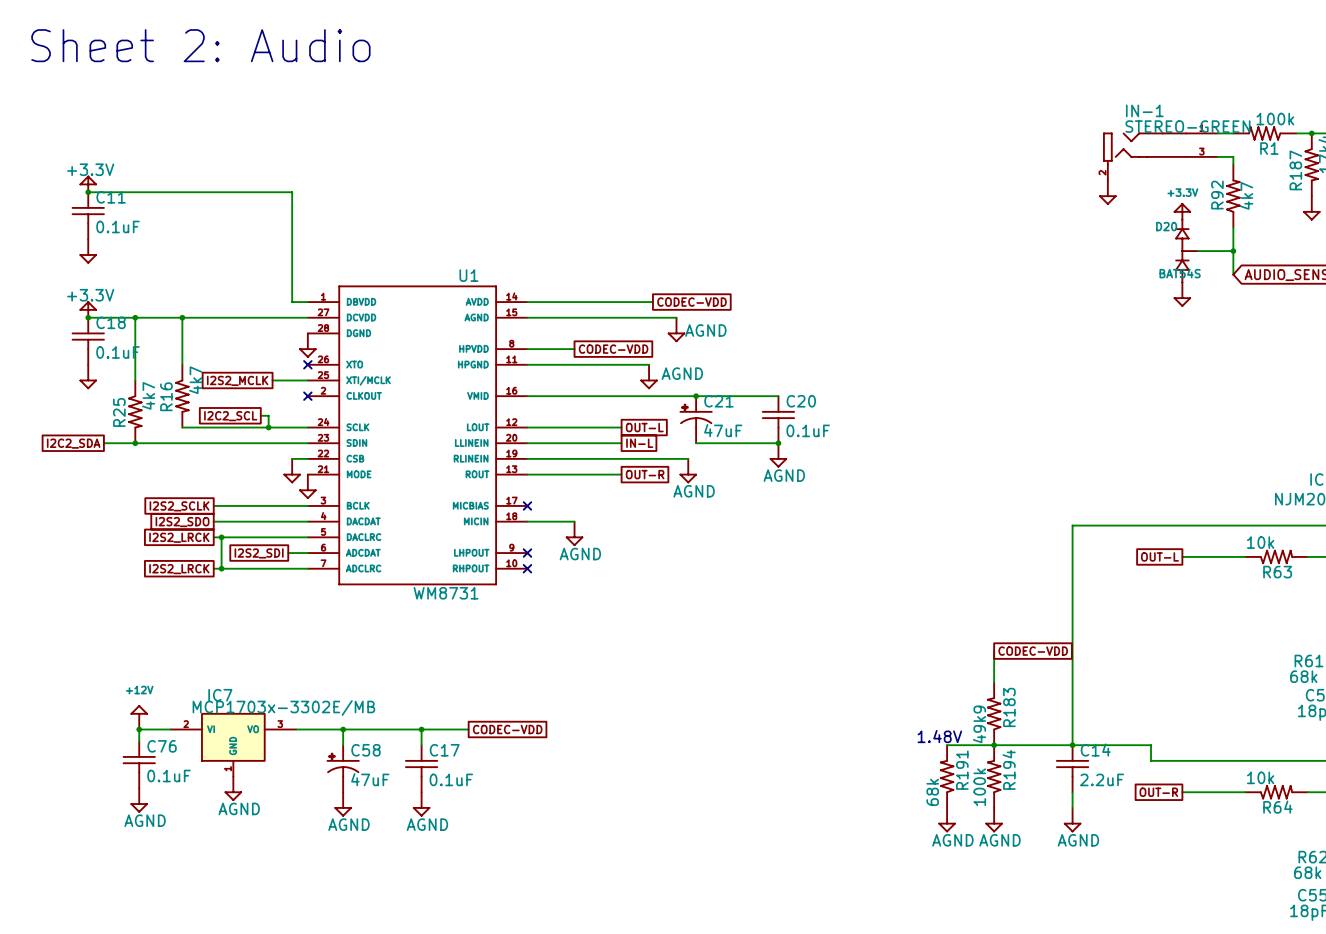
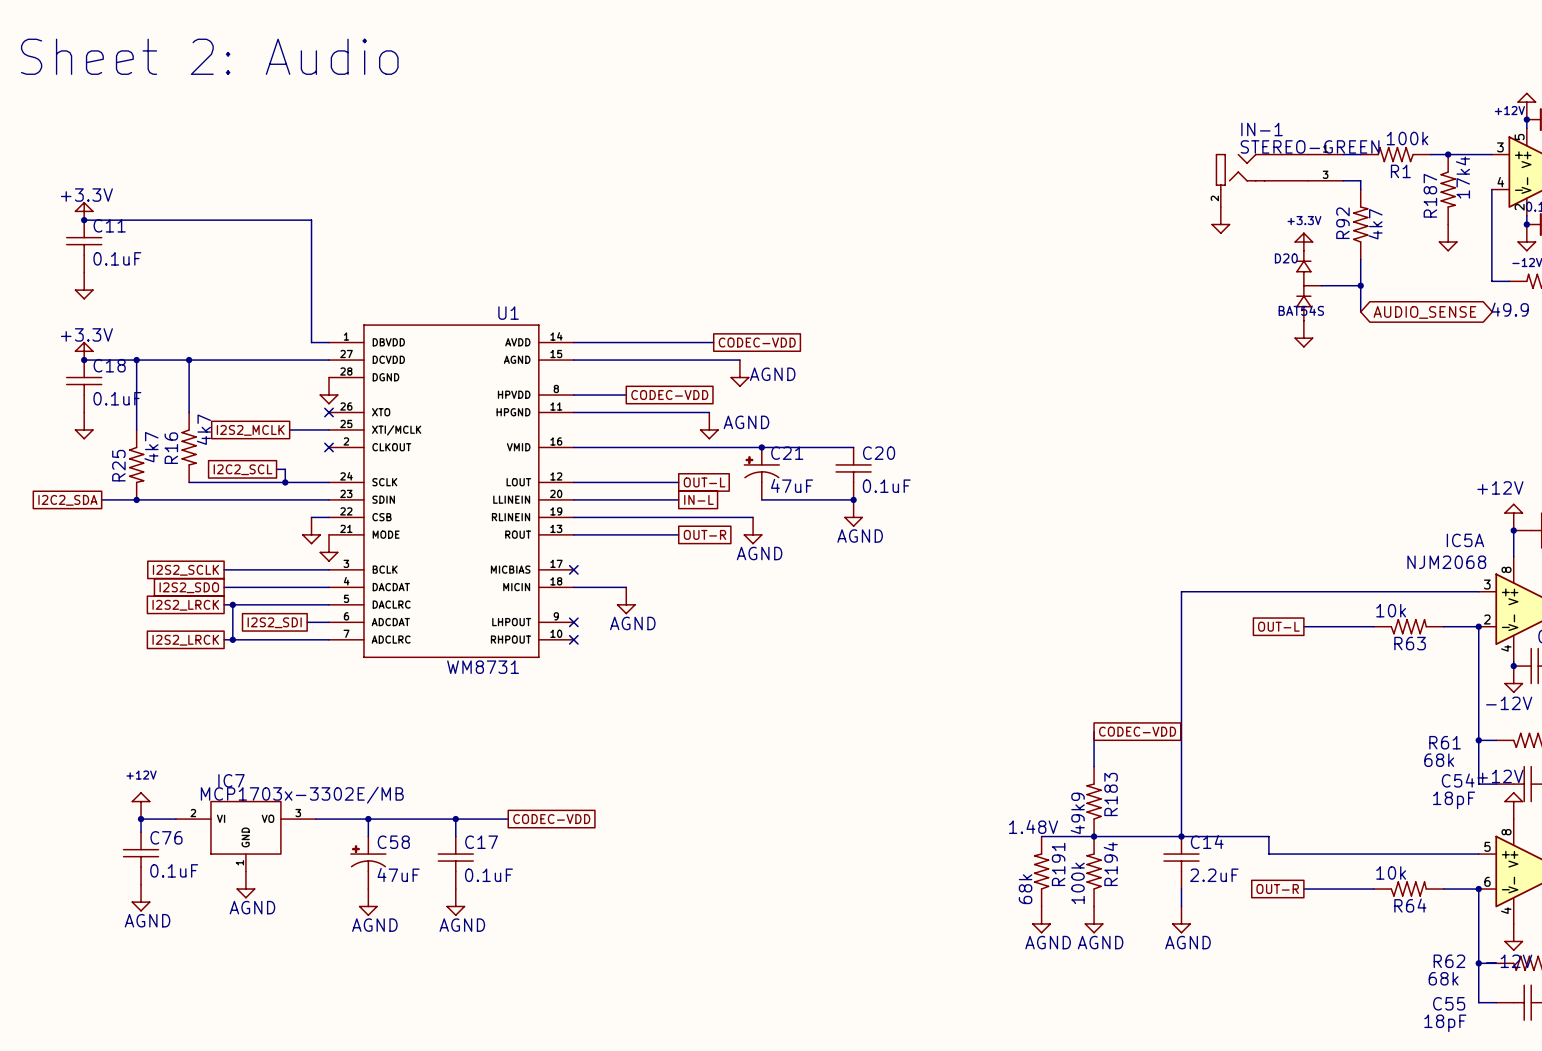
IC7 symbol: [170, 713, 297, 777] -> [175, 801, 316, 872]

